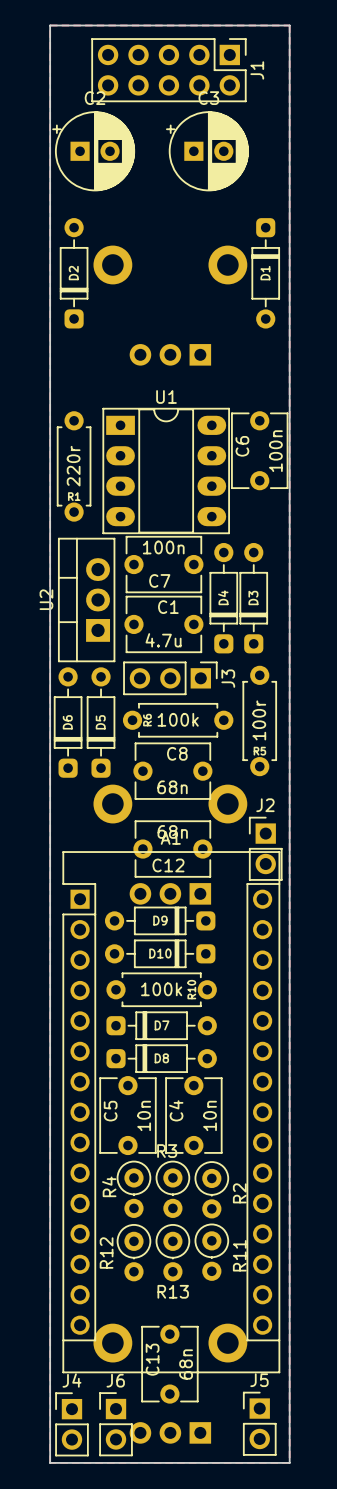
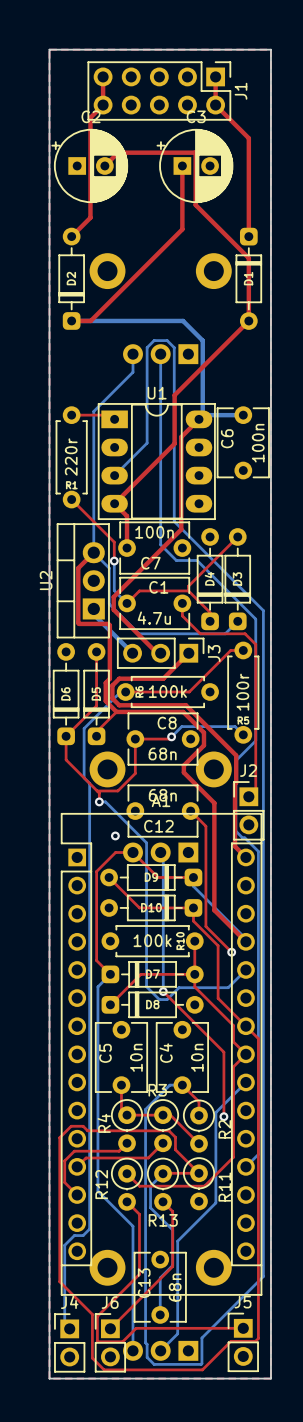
top track: none -> (103, 76) (103, 105) (90, 117) (90, 217) (71, 236)
top track: none -> (215, 76) (215, 105) (248, 138) (248, 236)
top track: none -> (104, 165) (118, 152) (194, 152) (195, 205) (248, 258) (248, 321) (174, 395) (174, 443) (114, 503) (127, 516) (127, 548)
top track: none -> (182, 165) (182, 229) (90, 320) (71, 320)
bottom track: none -> (71, 320) (183, 320) (202, 340) (202, 415)
bottom track: none -> (133, 354) (133, 372) (93, 411) (93, 552) (109, 568) (109, 604) (138, 633) (225, 633) (237, 621)
bottom track: none -> (160, 354) (160, 544) (176, 560) (197, 560) (255, 619) (255, 740) (235, 760) (235, 831) (258, 851) (258, 1154) (245, 1166)
top track: none -> (71, 415) (110, 415) (114, 419)
bottom track: none -> (243, 415) (203, 415) (199, 419)
top track: none -> (199, 419) (181, 437) (181, 529) (113, 597) (113, 609) (157, 653) (160, 653)
bottom track: none -> (114, 475) (147, 443) (147, 347) (154, 340) (167, 340) (174, 347) (174, 521) (263, 610) (263, 1276) (201, 1337) (201, 1364) (154, 1364) (147, 1357) (145, 1342) (145, 1109) (169, 1085) (182, 1085)
top track: none -> (71, 499) (114, 542) (114, 561)
top track: none -> (237, 536) (188, 586) (188, 590)
top track: none -> (93, 552) (78, 568) (78, 623) (109, 625) (109, 678) (105, 682) (105, 701) (116, 711)
bottom track: none -> (114, 561) (114, 590) (127, 603)
via: none -> (114, 561)
top track: none -> (188, 590) (139, 590) (127, 603)
top track: none -> (188, 590) (210, 612) (210, 621)
top track: none -> (182, 603) (182, 615) (200, 633) (245, 633) (255, 644) (255, 789) (248, 796)
bottom track: none -> (93, 608) (93, 614) (132, 653)
top track: none -> (243, 650) (230, 650) (189, 692) (125, 692)
top track: none -> (96, 651) (96, 705) (66, 736) (66, 759) (99, 793) (99, 801)
top track: none -> (188, 653) (163, 678) (119, 678) (112, 685) (112, 698) (119, 705) (185, 705) (236, 755) (234, 846) (245, 857)
bottom track: none -> (125, 692) (120, 692) (84, 728) (84, 777) (89, 783) (89, 1229) (83, 1235) (74, 1235) (64, 1245) (64, 1323) (69, 1328)
top track: none -> (116, 711) (183, 711) (203, 732) (203, 745) (183, 765) (183, 772) (214, 803) (214, 910) (245, 941)
top track: none -> (116, 711) (96, 731) (96, 736)
bottom track: none -> (243, 734) (235, 726) (181, 726) (171, 736)
top track: none -> (171, 736) (169, 739) (135, 739) (135, 773) (117, 790) (97, 790)
via: none -> (171, 736)
bottom track: none -> (99, 801) (105, 801) (146, 842) (146, 986) (159, 999) (167, 999) (179, 987) (228, 987) (245, 969)
via: none -> (99, 801)
top track: none -> (190, 811) (205, 826) (205, 926) (231, 952)
via: none -> (115, 835)
bottom track: none -> (160, 852) (163, 855) (163, 991)
top track: none -> (109, 877) (139, 907) (193, 907) (193, 921) (218, 945) (218, 998) (258, 1038) (258, 1338) (255, 1341) (231, 1341) (202, 1369) (104, 1369) (92, 1358) (92, 1314) (59, 1281) (59, 1137) (71, 1126) (83, 1126) (87, 1130) (168, 1130) (175, 1137) (175, 1149) (199, 1173) (163, 1173)
top track: none -> (193, 877) (157, 877) (133, 852) (115, 852) (96, 871) (96, 960) (110, 974)
bottom track: none -> (193, 877) (193, 886) (245, 938) (245, 941)
top track: none -> (194, 941) (194, 986) (233, 1025) (233, 1041) (245, 1054) (233, 1066) (233, 1157) (204, 1186) (139, 1186) (127, 1173)
via: none -> (231, 952)
bottom track: none -> (110, 974) (97, 986) (97, 1191) (133, 1226) (133, 1350)
top track: none -> (194, 974) (140, 974) (110, 1004)
top track: none -> (163, 991) (223, 1052) (223, 1116)
via: none -> (163, 991)
bottom track: none -> (245, 1082) (215, 1112) (215, 1202) (177, 1241) (177, 1333) (160, 1350)
top track: none -> (121, 1085) (121, 1109) (127, 1115) (170, 1115) (199, 1143)
top track: none -> (182, 1085) (199, 1101) (199, 1115)
via: none -> (223, 1116)
top track: none -> (127, 1143) (119, 1151) (74, 1151) (64, 1160) (64, 1182) (77, 1194)
top track: none -> (163, 1143) (148, 1158) (86, 1158) (77, 1166)
bottom track: none -> (163, 1173) (150, 1186) (150, 1207) (172, 1229) (172, 1265) (160, 1277) (160, 1314)
top track: none -> (127, 1201) (139, 1214) (139, 1274) (97, 1316) (97, 1341) (122, 1341) (136, 1328) (243, 1328)
top track: none -> (163, 1201) (172, 1211) (172, 1266) (110, 1328)

